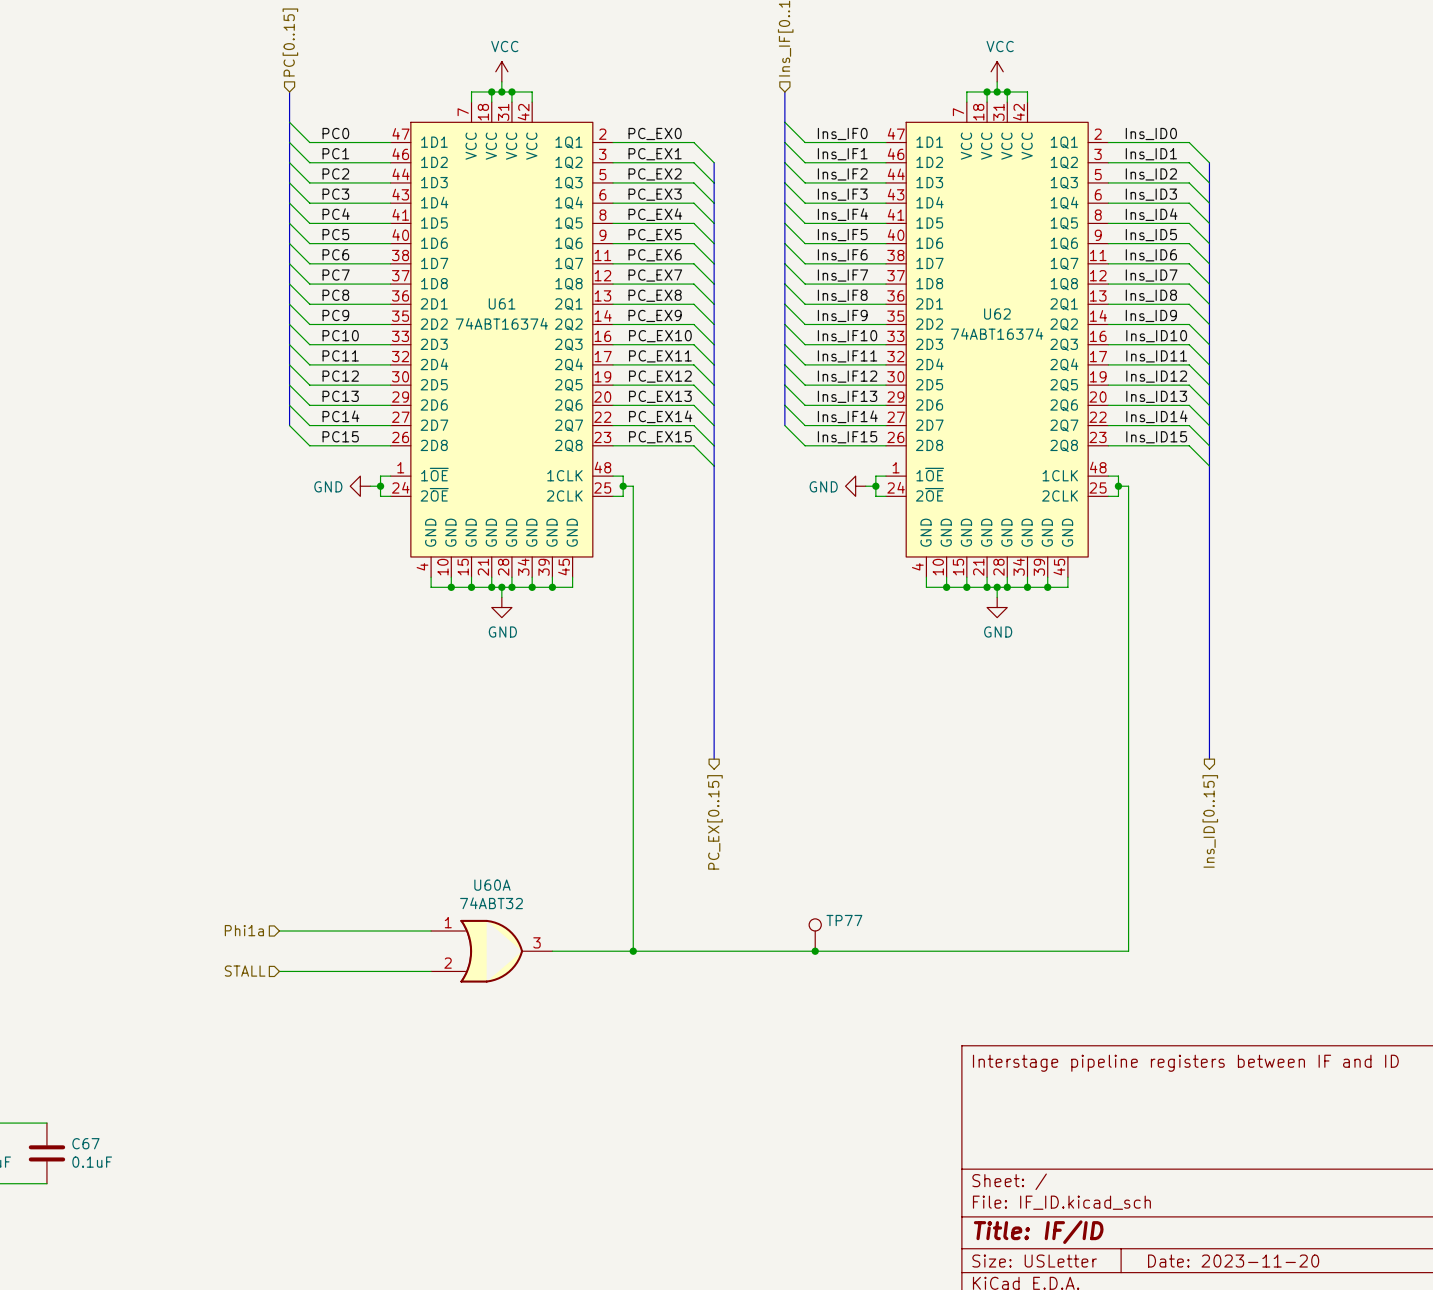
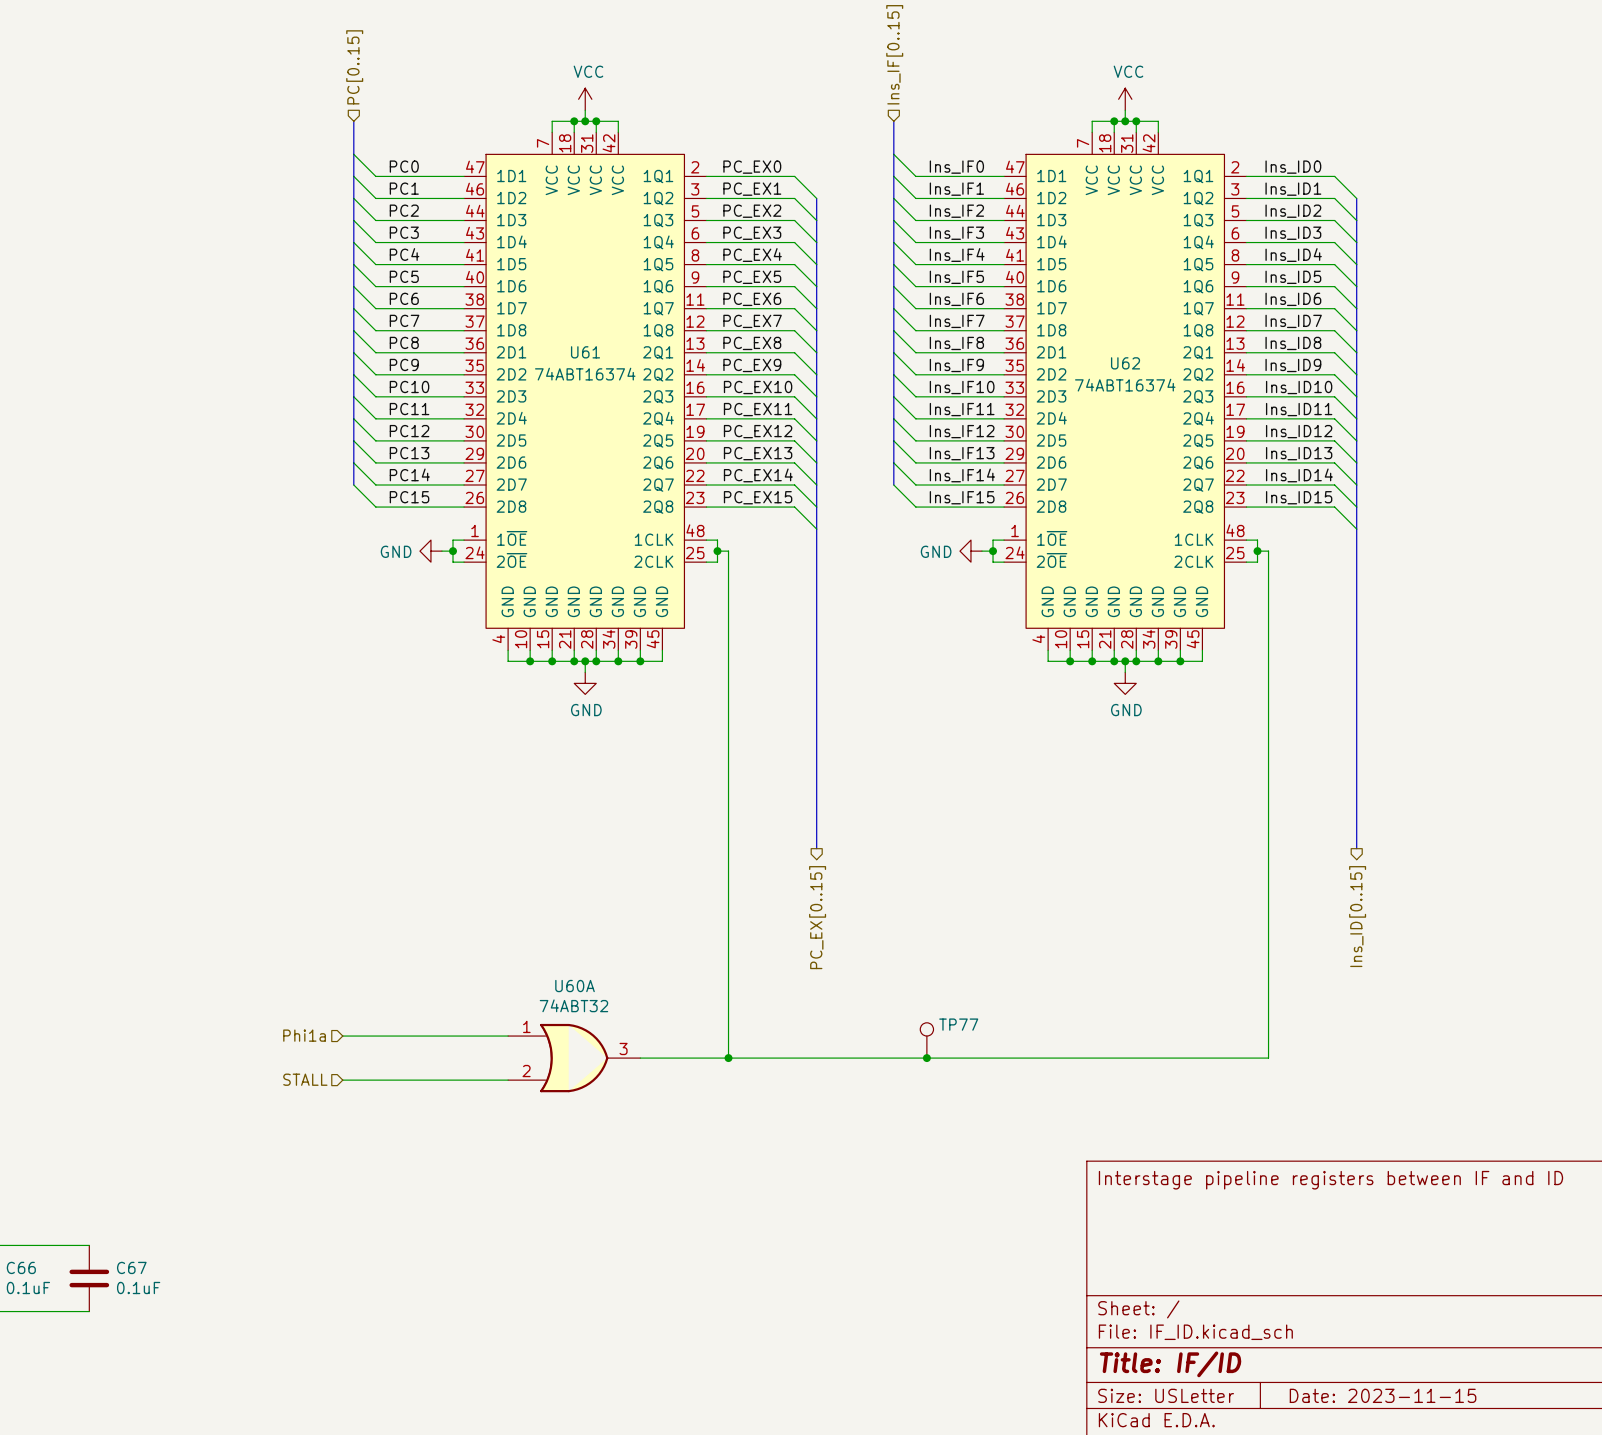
title block: Date: 2023-11-20 (1233, 1261) -> Date: 2023-11-15 (1383, 1395)

